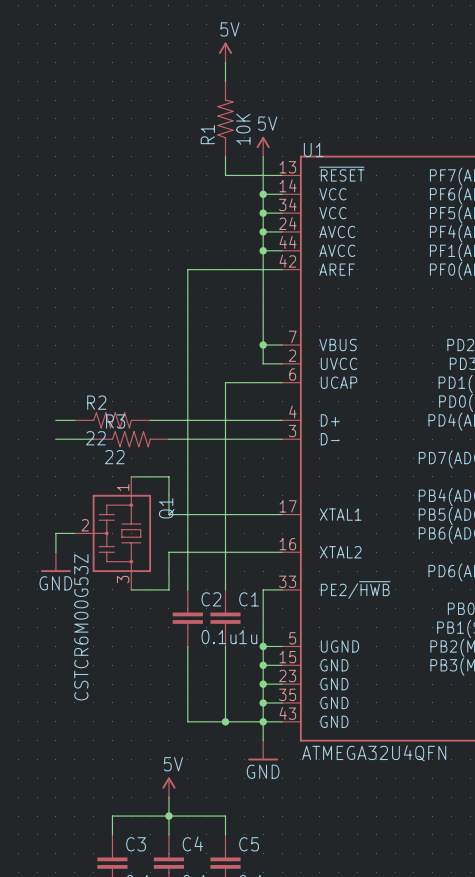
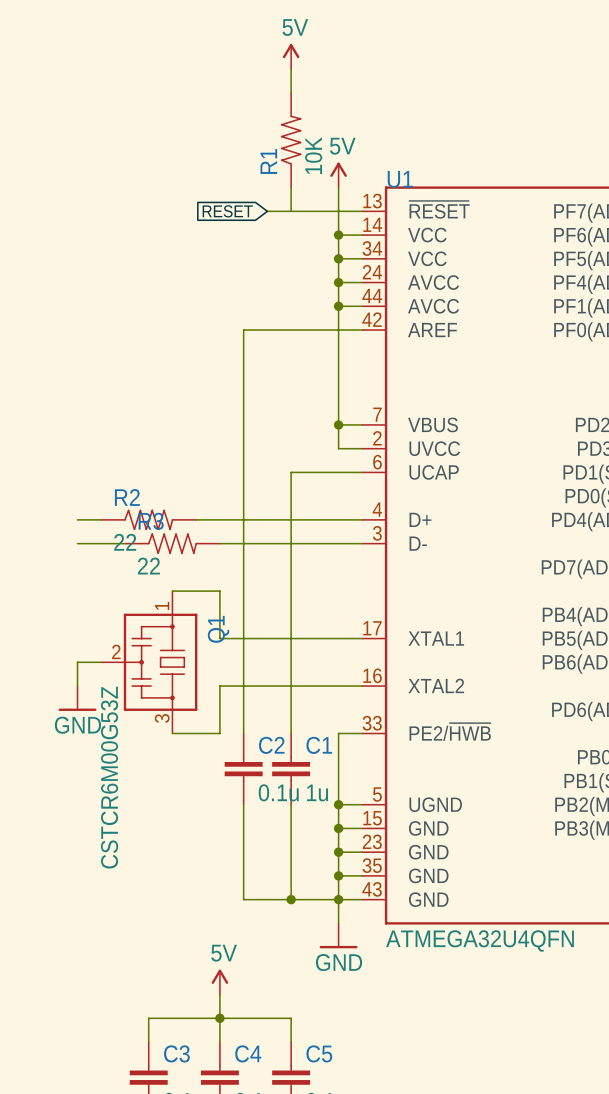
global label: none -> RESET (227, 211)
wire: none -> (267, 211) (291, 211)

